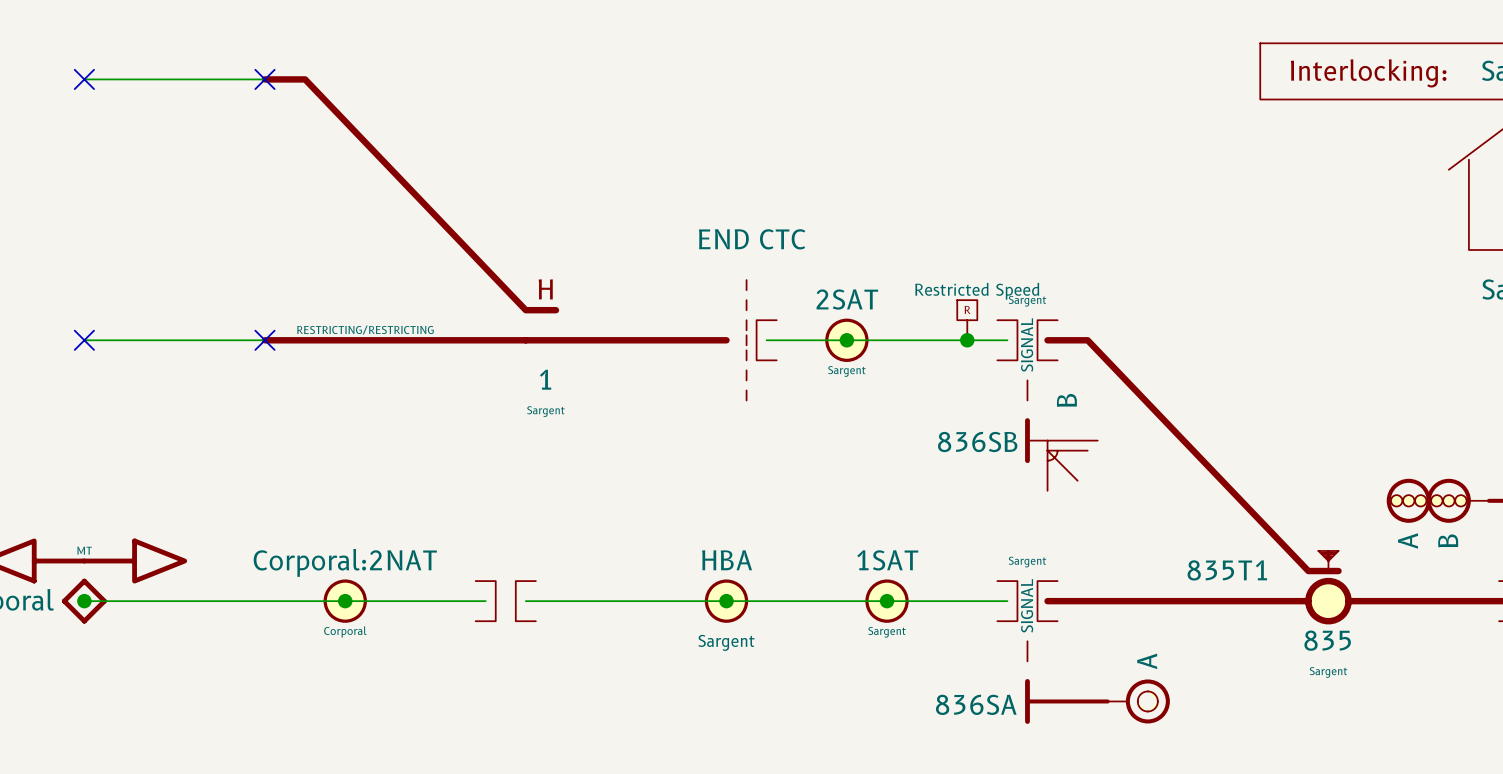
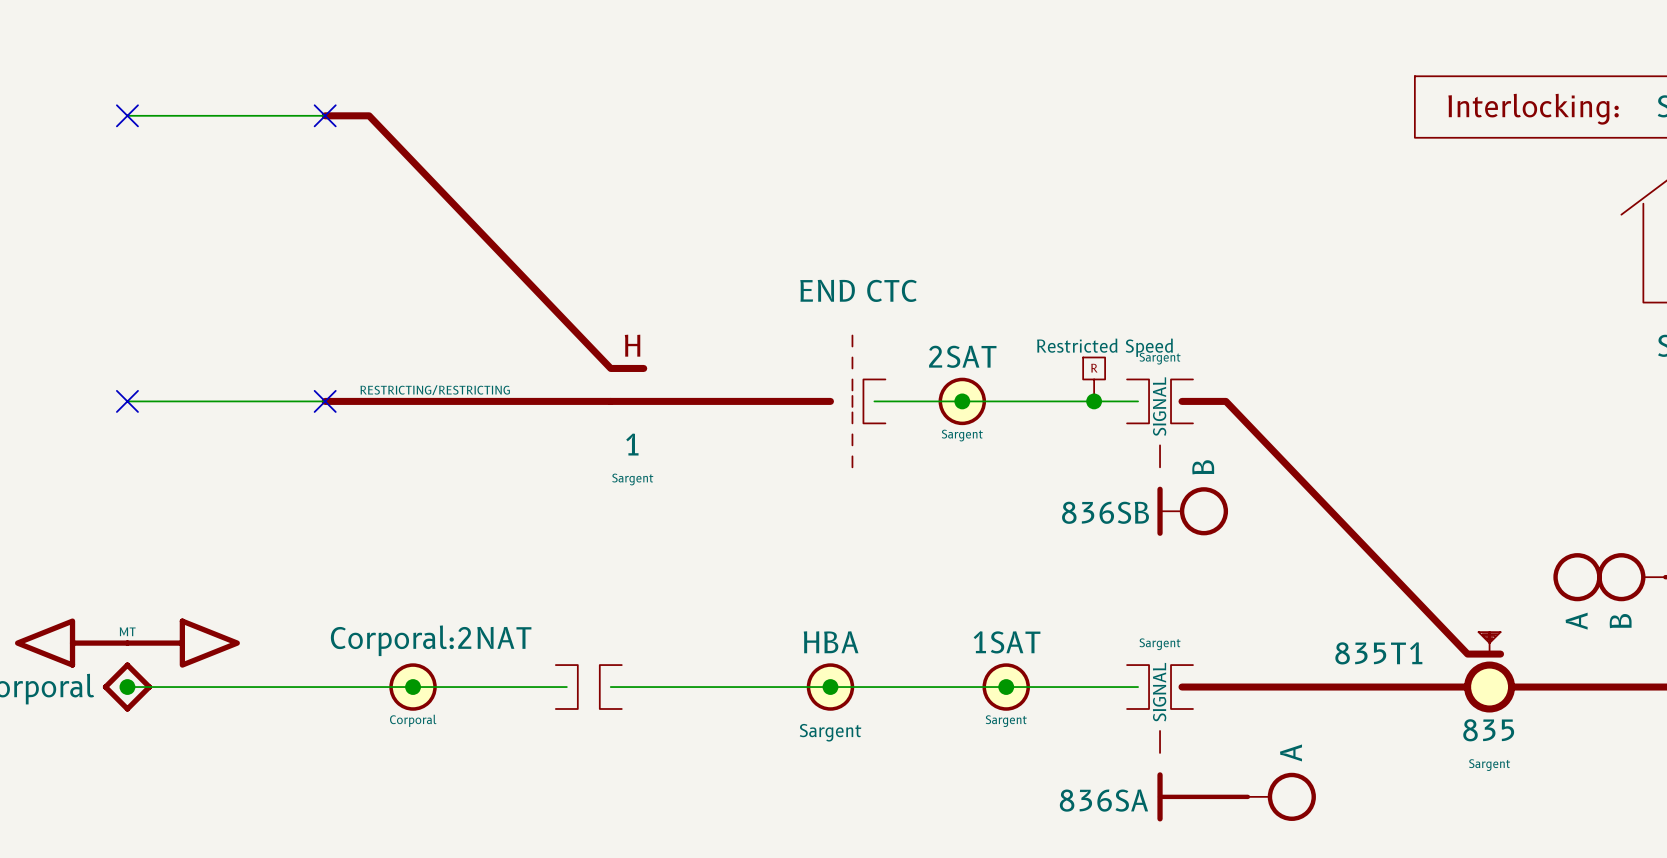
part: none -> B (1203, 511)
part: B (1072, 465) -> none
part symbol: [1386, 478, 1431, 523] -> [1553, 553, 1602, 602]
part symbol: [1426, 478, 1471, 523] -> [1597, 553, 1646, 602]
part value position: Corporal:2NAT (345, 562) -> Corporal:2NAT (431, 640)
part symbol: [1125, 679, 1170, 724] -> [1267, 772, 1316, 821]

